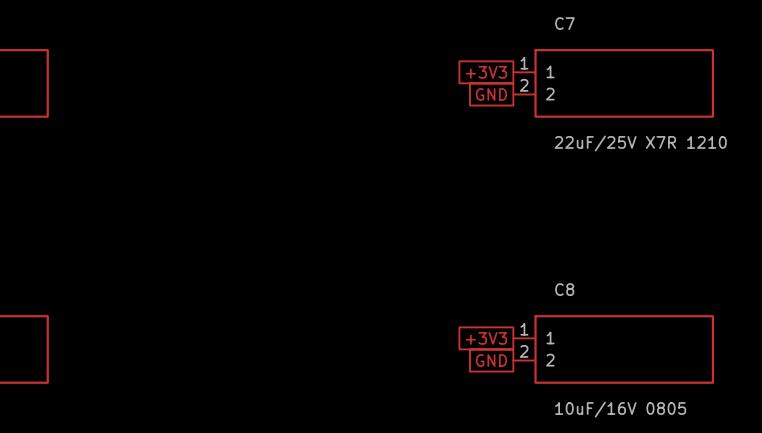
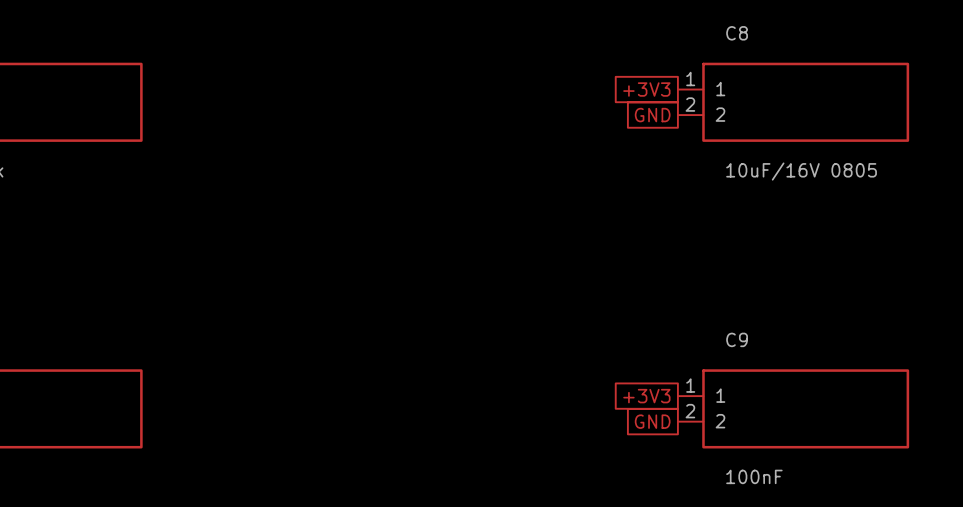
C7 name: C7 (564, 23) -> C8 (737, 33)
C7 value: 22uF/25V X7R 1210 (640, 143) -> 10uF/16V 0805 (801, 171)
C8 name: C8 (564, 289) -> C9 (737, 339)
C8 value: 10uF/16V 0805 (620, 409) -> 100nF (754, 476)

